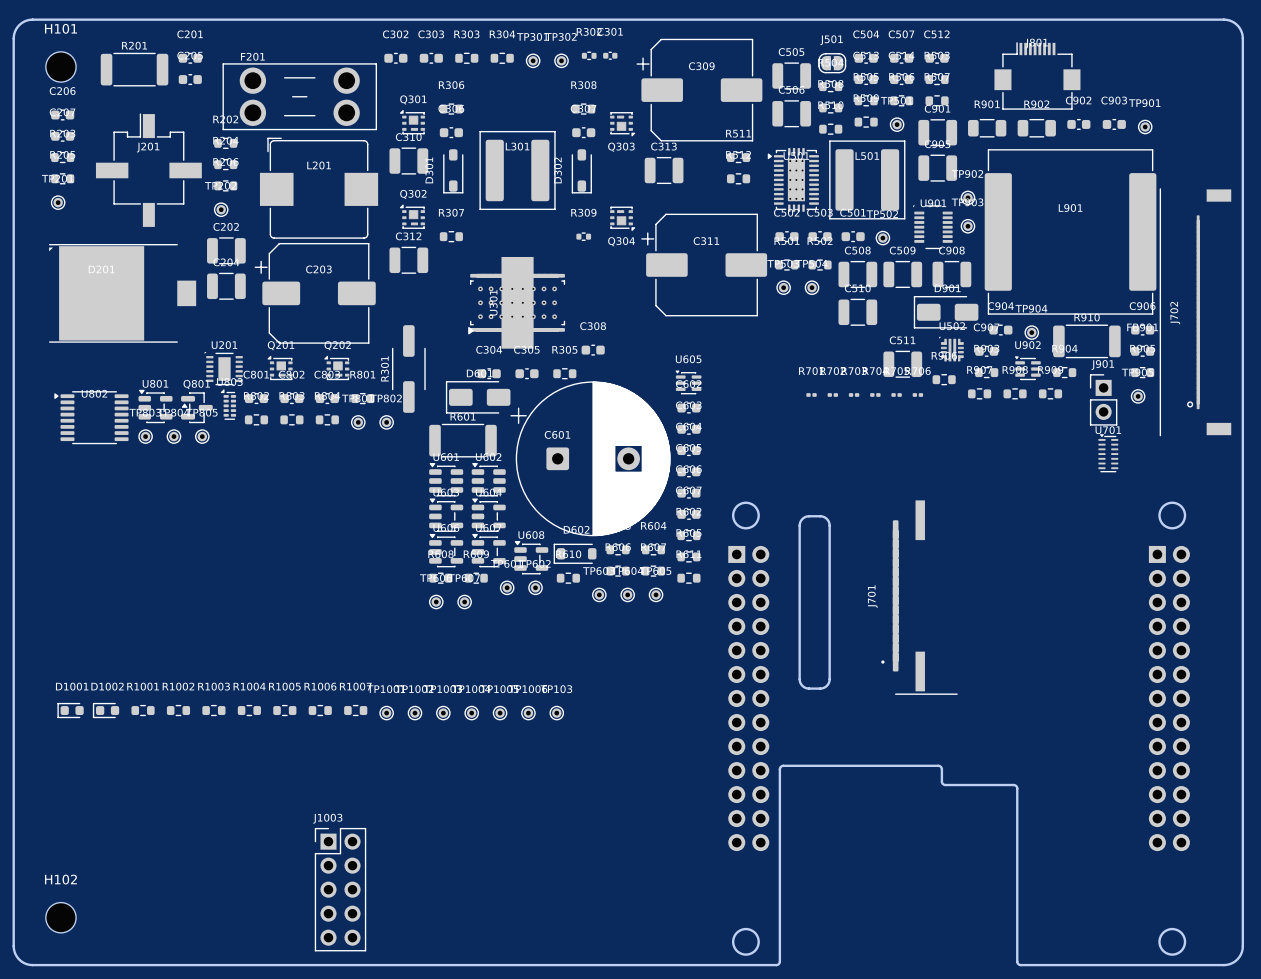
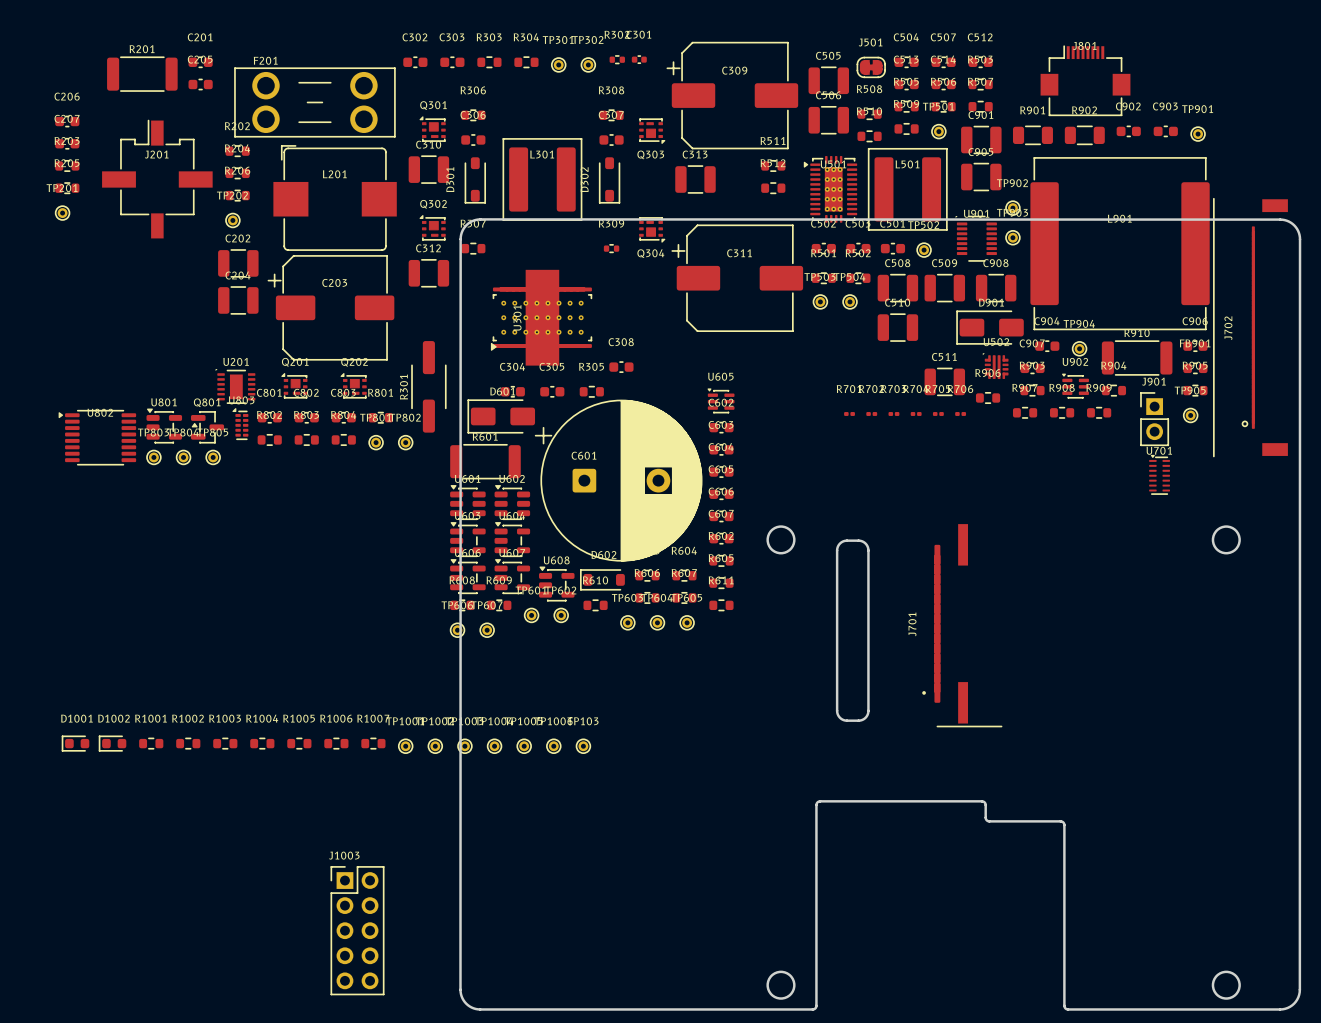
H101: (60, 66) -> none
part: (830, 86) -> none
part: (122, 293) -> none
part: (748, 698) -> none
part: (1169, 698) -> none
H102: (60, 917) -> none
board edge: (458, 965) (32, 965) (22, 962) (15, 954) (13, 946) (13, 38) (16, 28) (24, 21) (32, 19) (1223, 19) (1235, 23) (1240, 30) (1242, 38) (1242, 946) (1237, 959) (1223, 965) -> (480, 1009) (466, 1003) (460, 989) (460, 239) (466, 225) (480, 219) (1280, 219) (1294, 225) (1300, 239) (1299, 989) (1298, 997) (1294, 1003) (1287, 1007) (1280, 1009)

